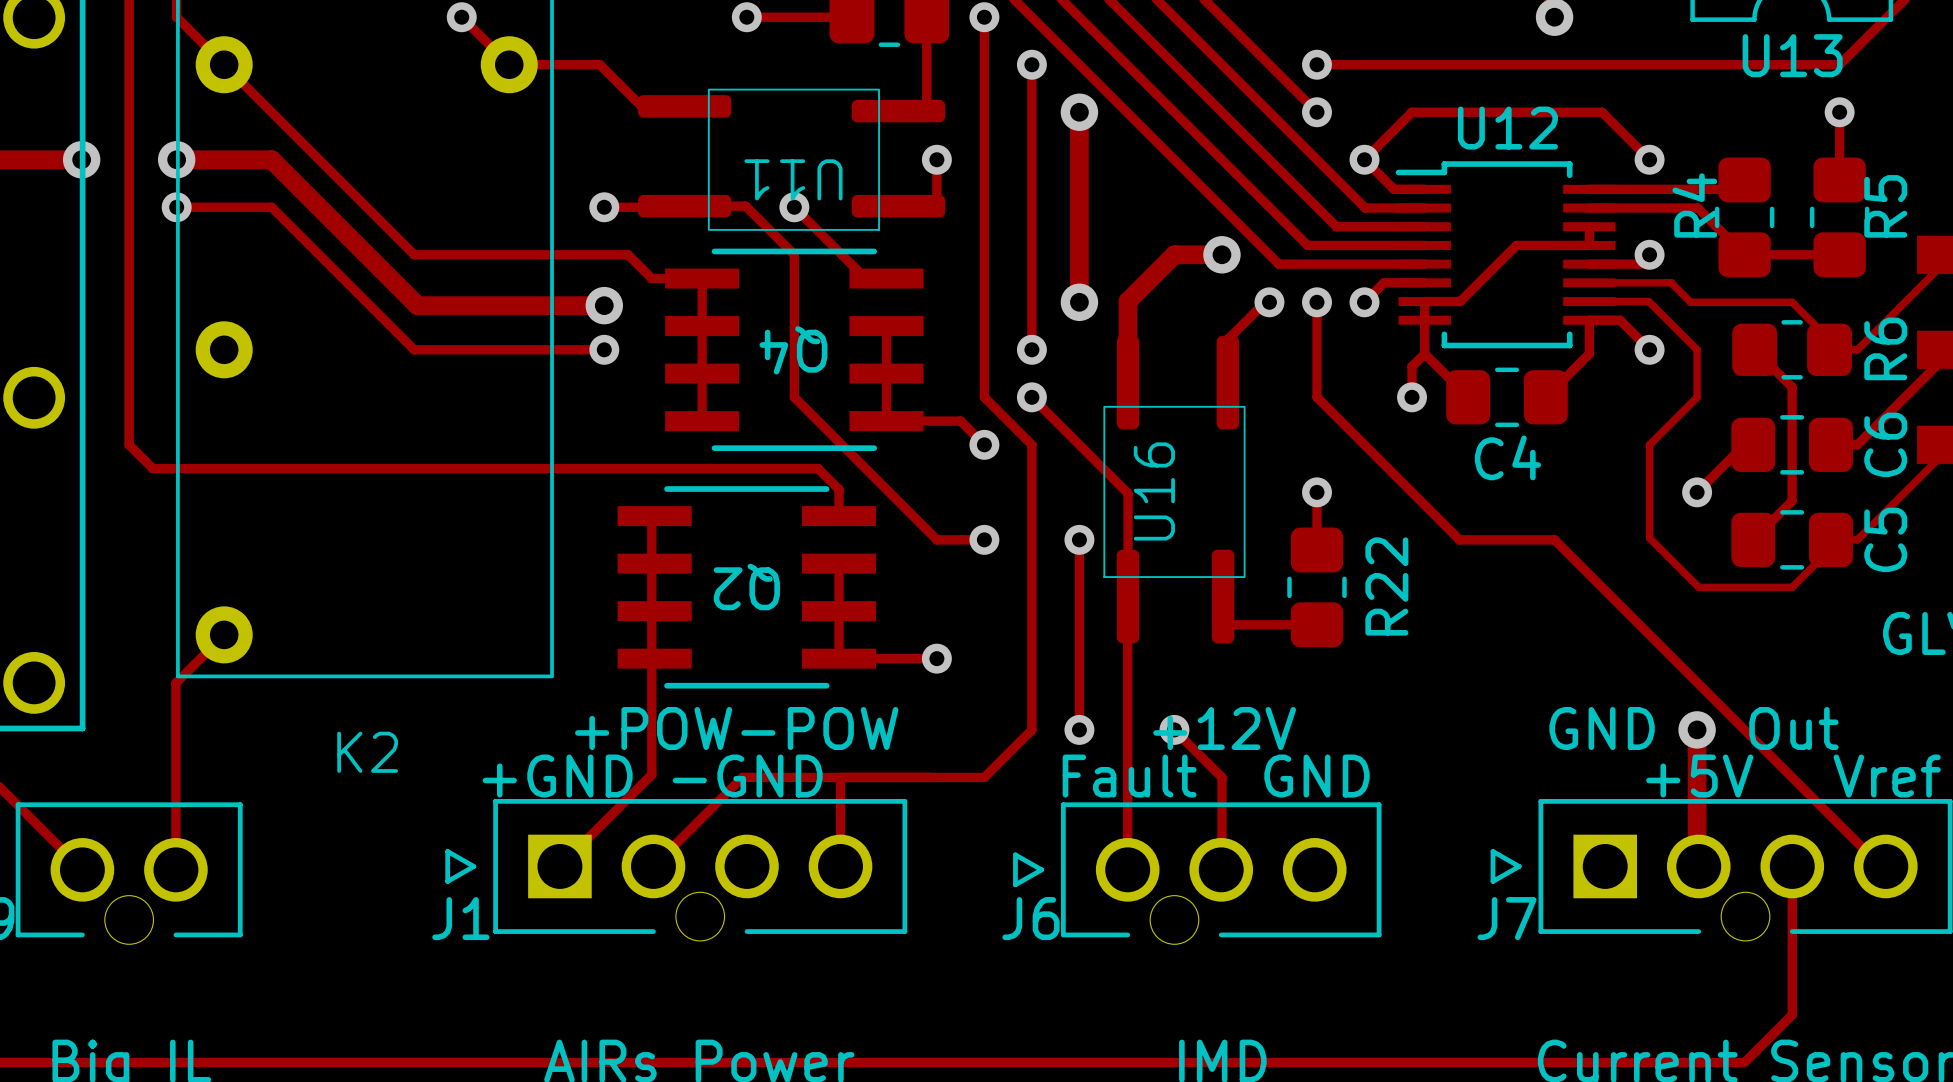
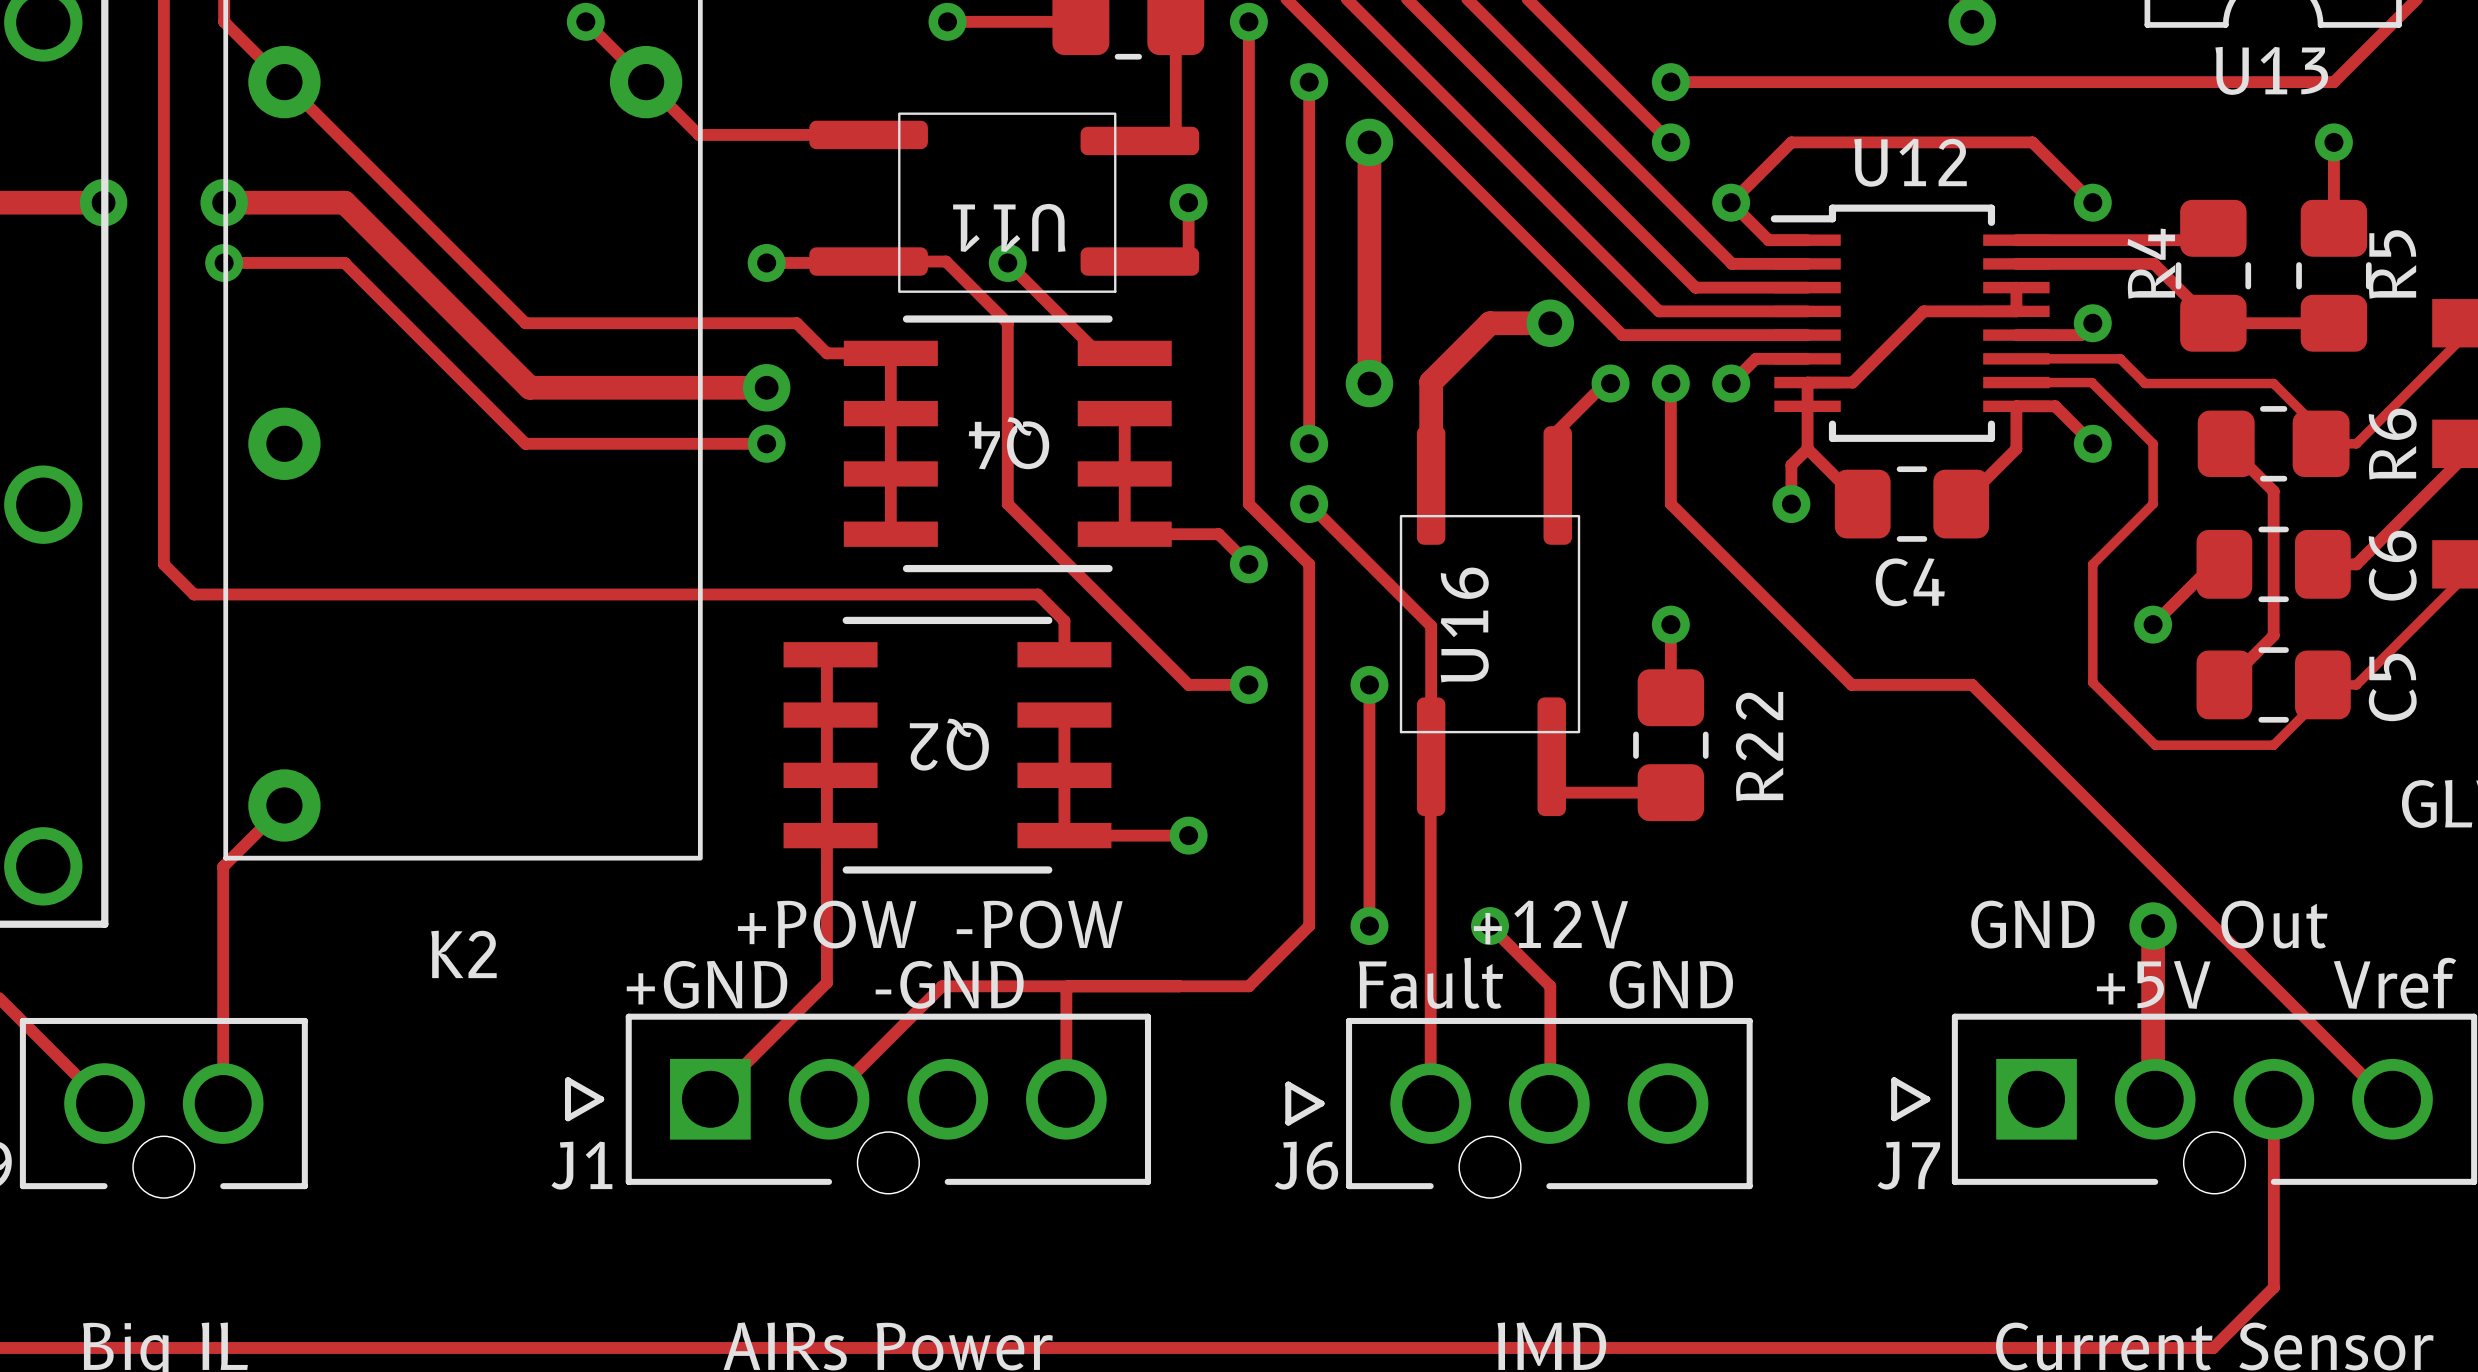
track: (509, 64) (599, 64) (641, 106) -> (646, 82) (698, 134) (813, 134)

